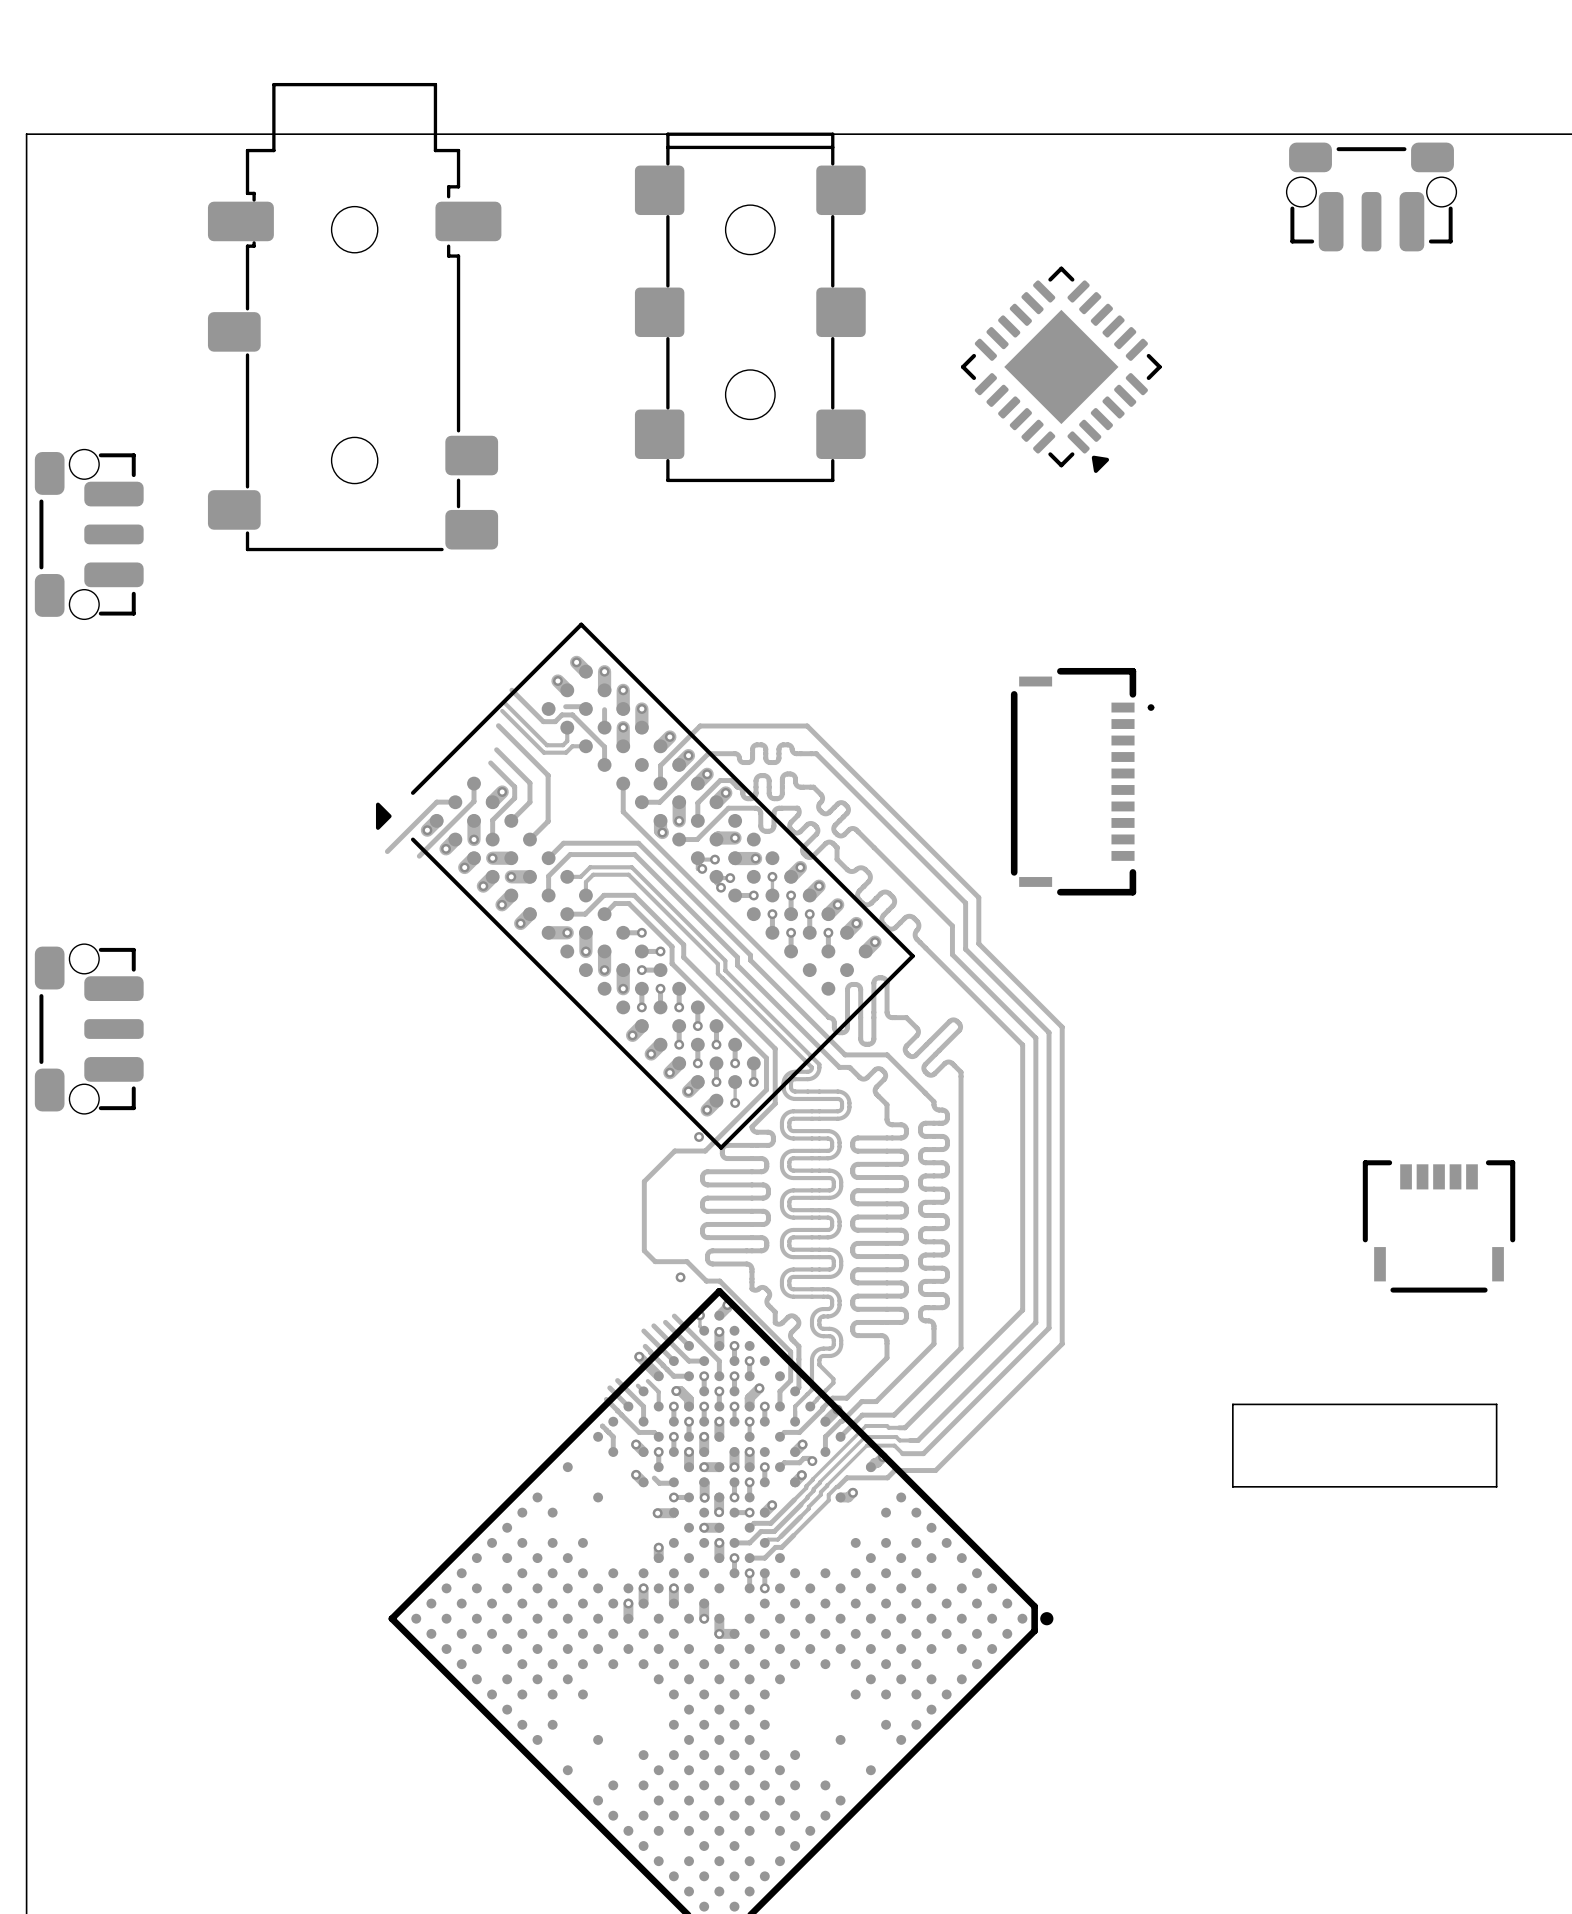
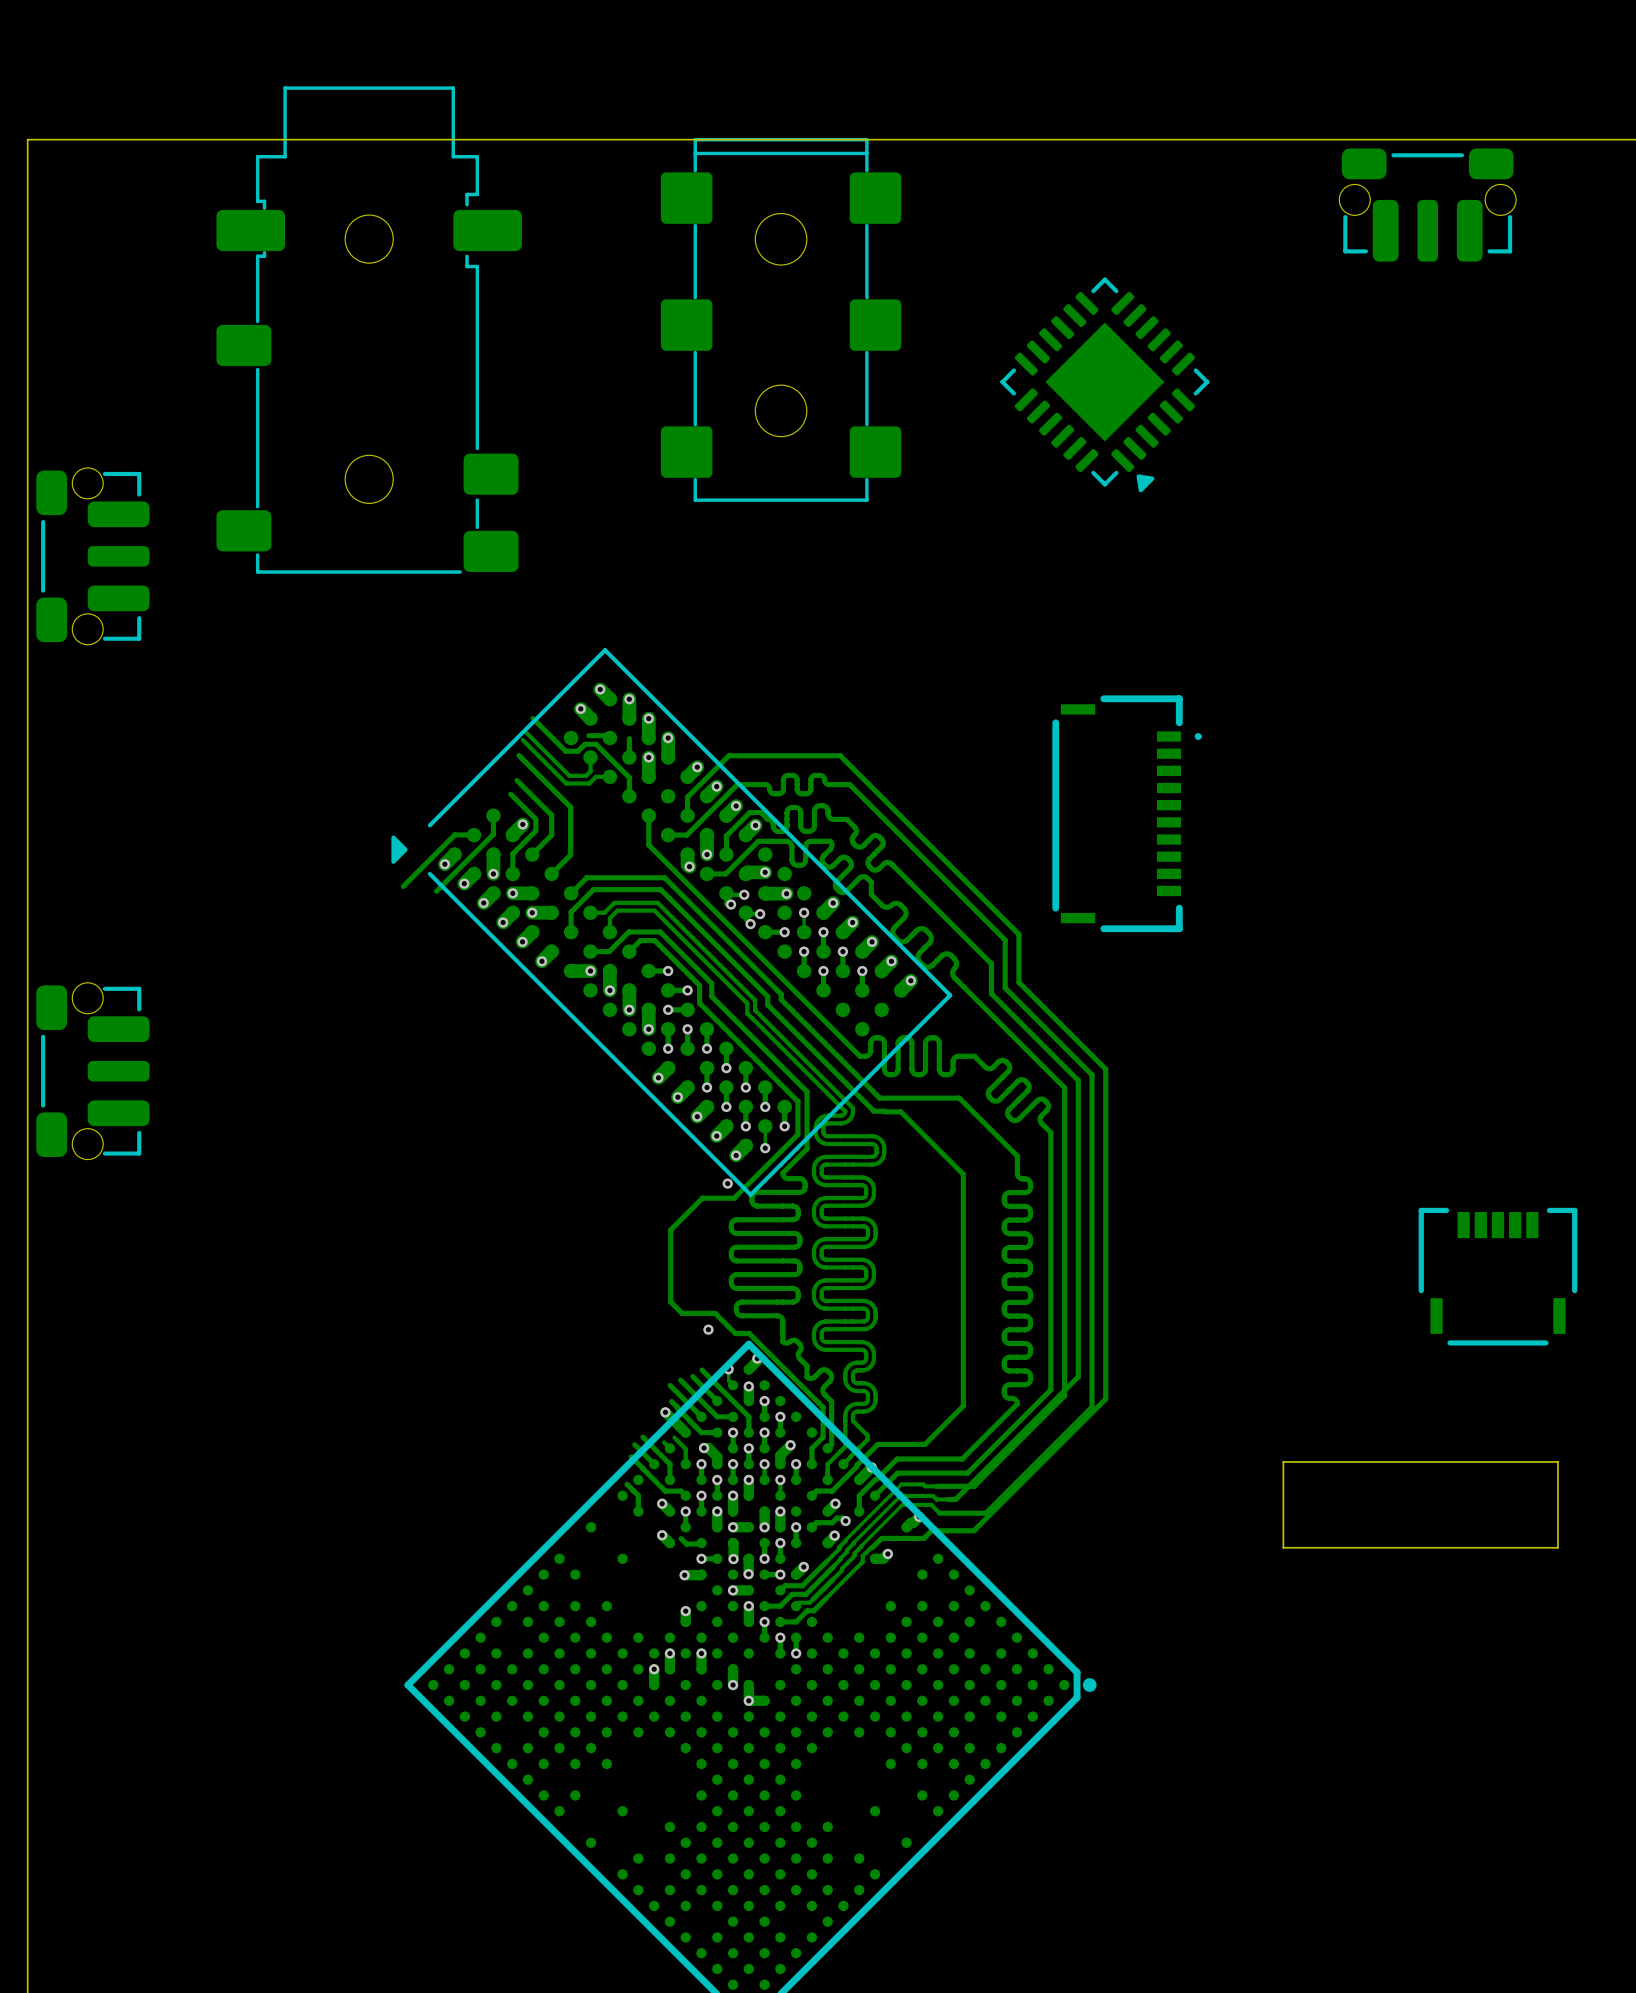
track: (826, 1014) (833, 1020) (836, 1031) (845, 1031) (847, 988) (851, 984) (858, 985) (860, 989) (860, 1040) (864, 1044) (871, 1043) (873, 1038) (873, 982) (876, 978) (882, 977) (887, 982) (888, 1015) (891, 1017) (906, 1017) (918, 1029) (917, 1035) (905, 1048) (909, 1055) (915, 1055) (950, 1020) (956, 1020) (960, 1026) (959, 1030) (923, 1068) (927, 1074) (932, 1075) (949, 1062) (961, 1072) (961, 1348) (894, 1415) -> (859, 1056) (869, 1054) (872, 1038) (881, 1038) (884, 1042) (884, 1071) (888, 1074) (894, 1074) (898, 1069) (898, 1041) (901, 1038) (907, 1038) (911, 1042) (912, 1071) (915, 1074) (921, 1074) (925, 1069) (926, 1041) (928, 1038) (935, 1038) (939, 1041) (939, 1069) (942, 1074) (951, 1072) (953, 1059) (957, 1056) (974, 1056) (988, 1068) (1001, 1060) (1008, 1063) (1008, 1071) (988, 1091) (988, 1096) (993, 1100) (998, 1100) (1019, 1080) (1023, 1079) (1027, 1083) (1028, 1090) (1008, 1111) (1008, 1115) (1012, 1119) (1018, 1119) (1039, 1099) (1044, 1099) (1048, 1105) (1040, 1119) (1050, 1132) (1050, 1389) (967, 1473) (930, 1473)
track: (887, 1054) (933, 1101) (935, 1108) (944, 1110) (947, 1113) (944, 1122) (924, 1123) (920, 1128) (923, 1135) (942, 1136) (947, 1140) (944, 1148) (924, 1149) (920, 1154) (923, 1162) (942, 1162) (947, 1166) (947, 1172) (944, 1175) (924, 1176) (920, 1181) (923, 1188) (945, 1190) (947, 1193) (946, 1199) (942, 1202) (923, 1202) (920, 1210) (924, 1215) (944, 1216) (947, 1224) (942, 1228) (923, 1229) (920, 1236) (924, 1241) (944, 1242) (947, 1250) (943, 1254) (923, 1255) (920, 1262) (924, 1268) (944, 1268) (947, 1276) (943, 1281) (923, 1281) (920, 1289) (924, 1294) (944, 1294) (947, 1302) (943, 1307) (925, 1307) (921, 1309) (921, 1318) (933, 1324) (933, 1343) (876, 1401) -> (923, 1098) (959, 1098) (1017, 1156) (1017, 1175) (1030, 1182) (1028, 1191) (1007, 1193) (1004, 1196) (1004, 1200) (1008, 1206) (1025, 1206) (1029, 1209) (1030, 1215) (1028, 1218) (1007, 1220) (1004, 1223) (1004, 1228) (1008, 1233) (1027, 1234) (1030, 1237) (1030, 1244) (1025, 1247) (1007, 1247) (1004, 1250) (1004, 1255) (1008, 1261) (1027, 1261) (1030, 1265) (1030, 1270) (1025, 1274) (1007, 1275) (1004, 1278) (1004, 1283) (1008, 1288) (1027, 1289) (1030, 1292) (1030, 1298) (1025, 1302) (1007, 1302) (1004, 1305) (1004, 1310) (1008, 1315) (1027, 1316) (1030, 1325) (1026, 1329) (1006, 1330) (1004, 1338) (1008, 1343) (1027, 1344) (1030, 1352) (1026, 1357) (1006, 1357) (1004, 1365) (1008, 1370) (1027, 1371) (1030, 1379) (1026, 1384) (1009, 1384) (1005, 1386) (1005, 1396) (1014, 1399) (1017, 1403) (962, 1459) (912, 1459)
track: (850, 1068) (863, 1079) (877, 1068) (884, 1071) (885, 1077) (875, 1087) (875, 1092) (886, 1104) (888, 1122) (903, 1125) (906, 1130) (905, 1135) (902, 1137) (857, 1138) (852, 1141) (853, 1147) (856, 1150) (901, 1151) (906, 1156) (905, 1161) (902, 1164) (857, 1164) (853, 1167) (853, 1174) (856, 1177) (901, 1177) (906, 1182) (905, 1188) (901, 1190) (857, 1190) (853, 1193) (852, 1199) (856, 1203) (901, 1203) (906, 1209) (905, 1214) (901, 1216) (854, 1218) (852, 1225) (855, 1229) (901, 1230) (905, 1232) (906, 1238) (901, 1243) (856, 1243) (852, 1247) (853, 1254) (857, 1256) (901, 1256) (905, 1259) (906, 1264) (901, 1269) (856, 1269) (853, 1273) (853, 1279) (857, 1282) (902, 1283) (905, 1285) (906, 1290) (901, 1296) (856, 1296) (853, 1299) (852, 1305) (857, 1309) (902, 1309) (905, 1311) (906, 1317) (901, 1322) (854, 1324) (852, 1331) (855, 1335) (885, 1337) (886, 1357) (846, 1398) (832, 1398) -> (885, 1111) (900, 1111) (963, 1174) (963, 1406) (924, 1444) (877, 1444) (866, 1455)
track: (1022, 1310) (904, 1427) -> (1064, 1363) (1064, 1395) (974, 1486) (942, 1486)
track: (1049, 1328) (923, 1453) -> (1092, 1382) (1092, 1407) (986, 1513) (961, 1513)

